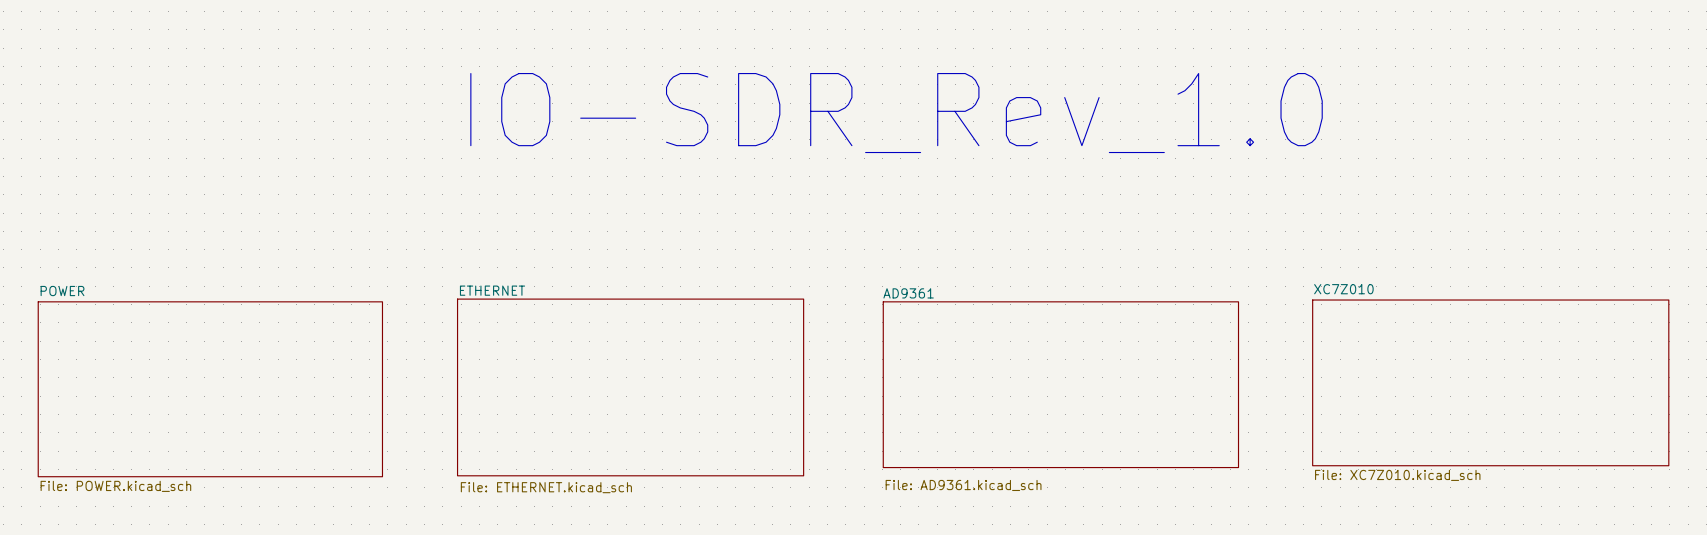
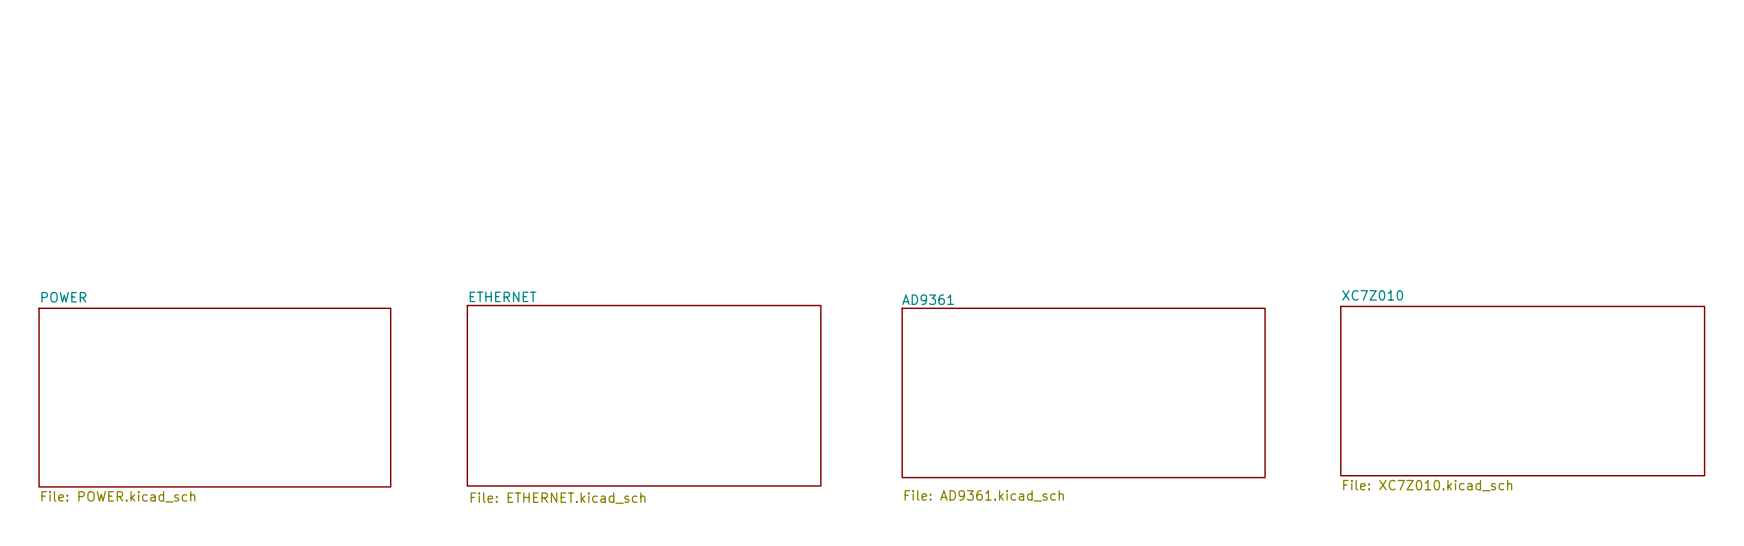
text: IO-SDR_Rev_1.0 (896, 113) -> none

